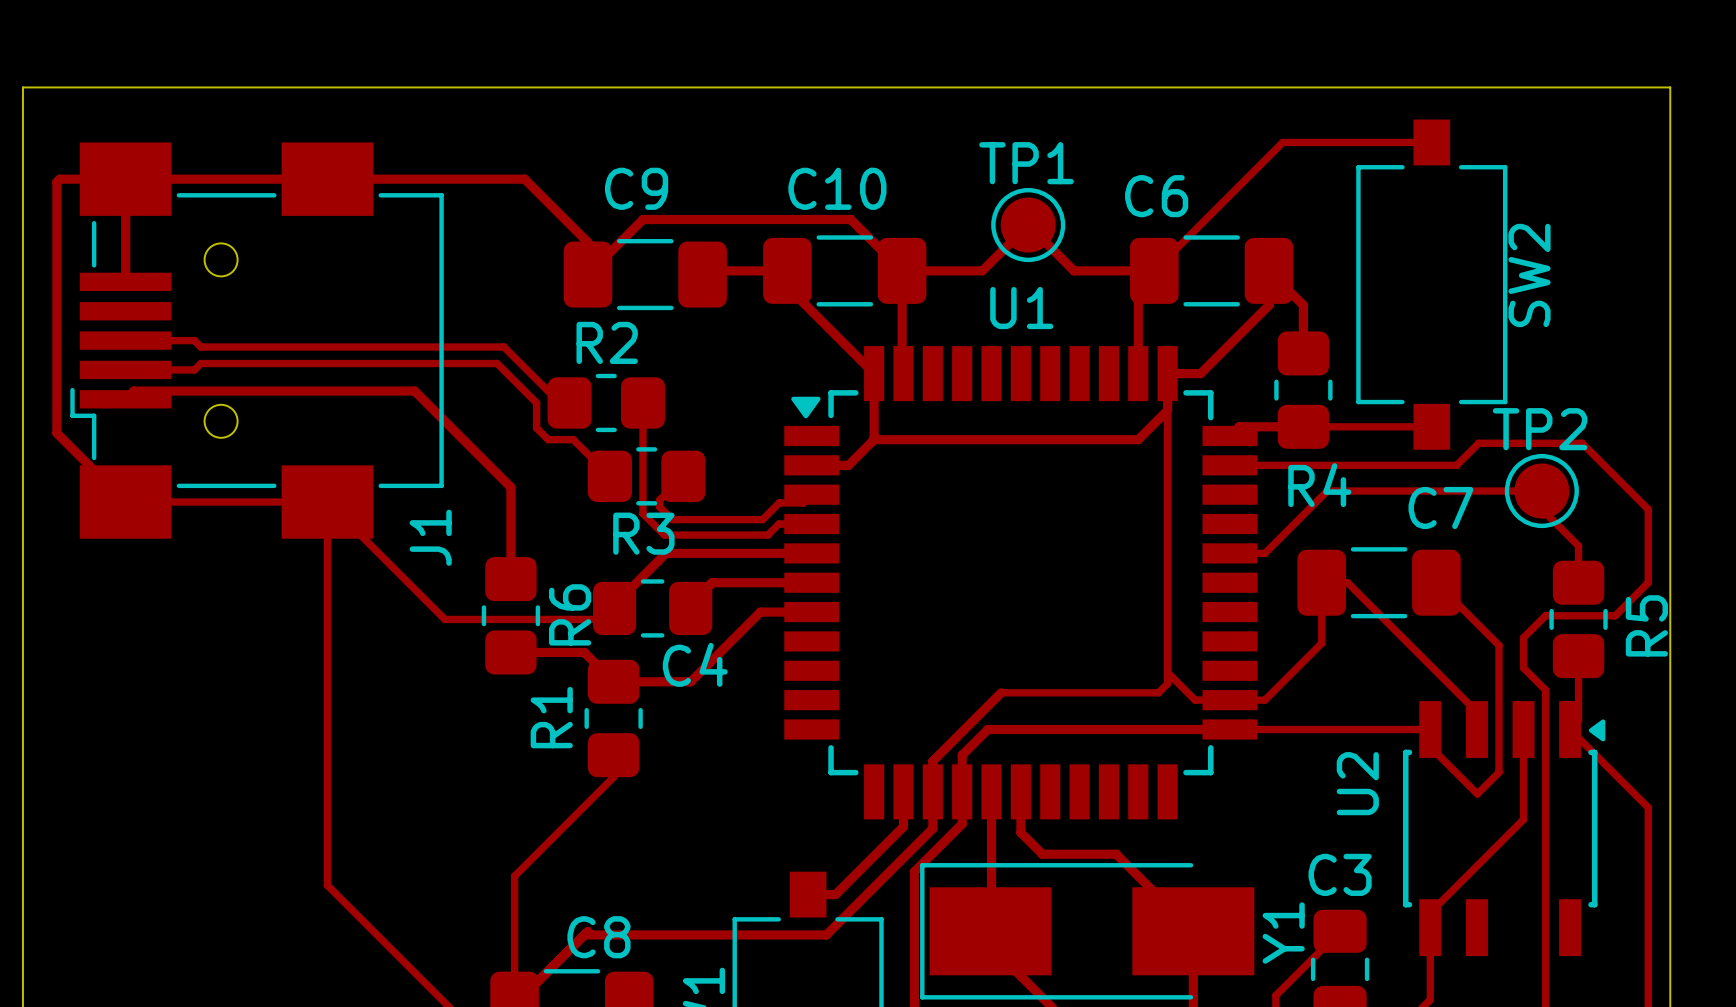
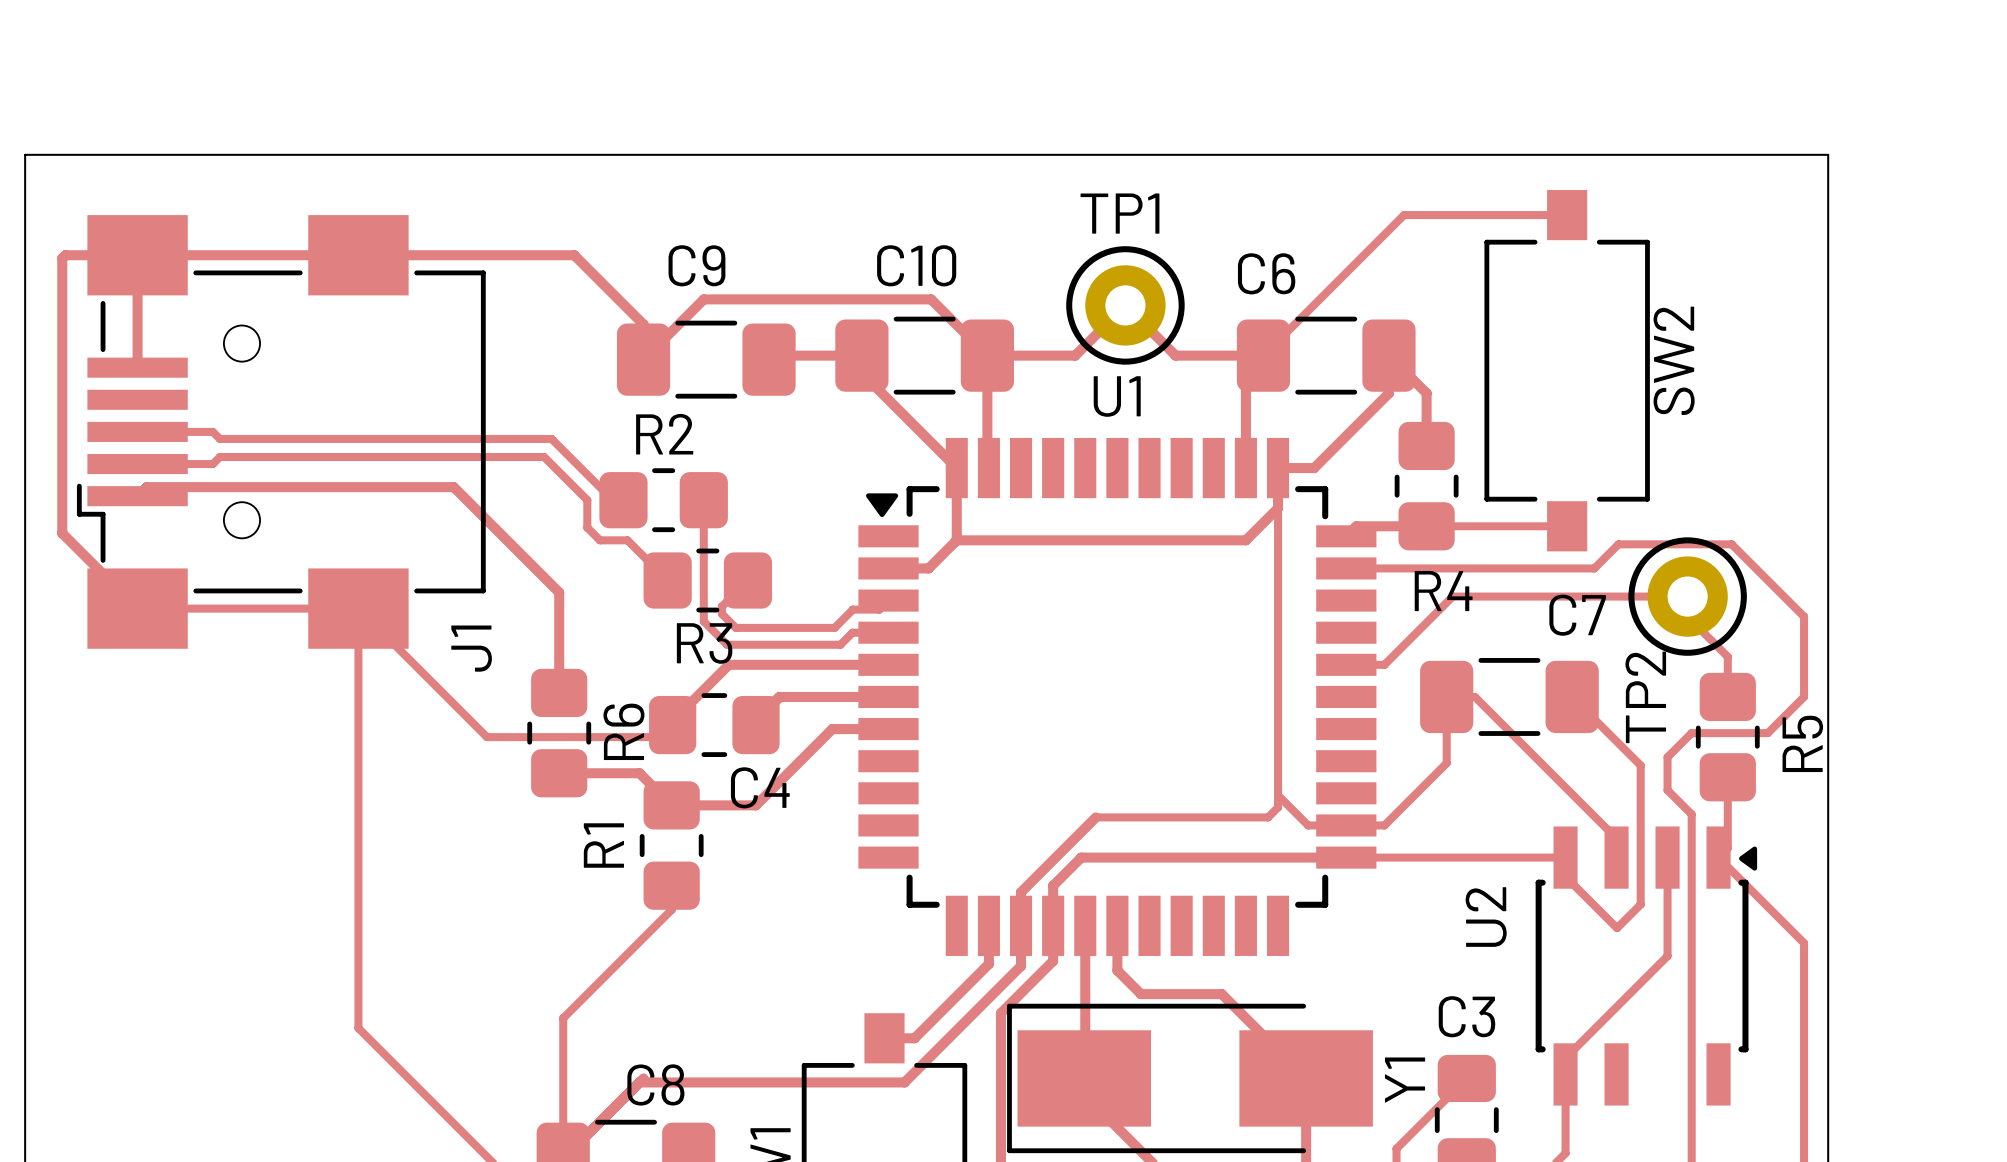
TP1 footprint: [991, 187, 1066, 263] -> [1066, 246, 1185, 365]
TP2 name position: TP2 (1540, 429) -> TP2 (1645, 697)
TP2 footprint: [1504, 453, 1579, 529] -> [1628, 537, 1747, 656]

